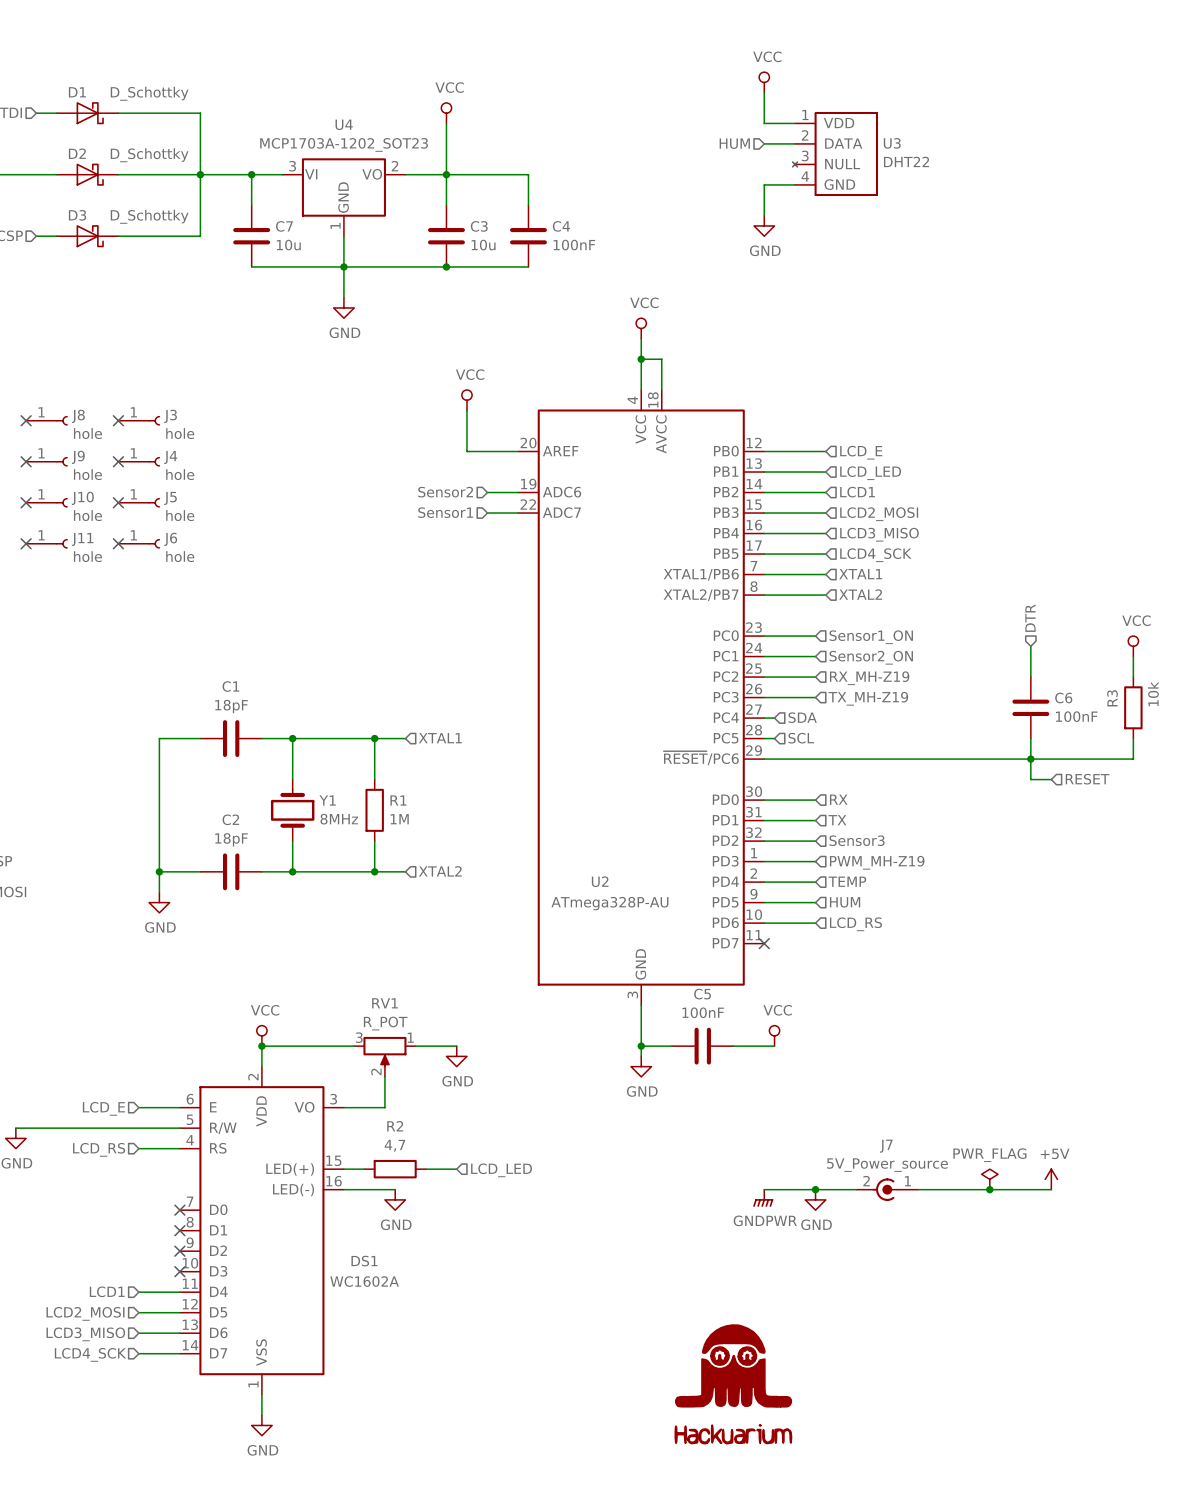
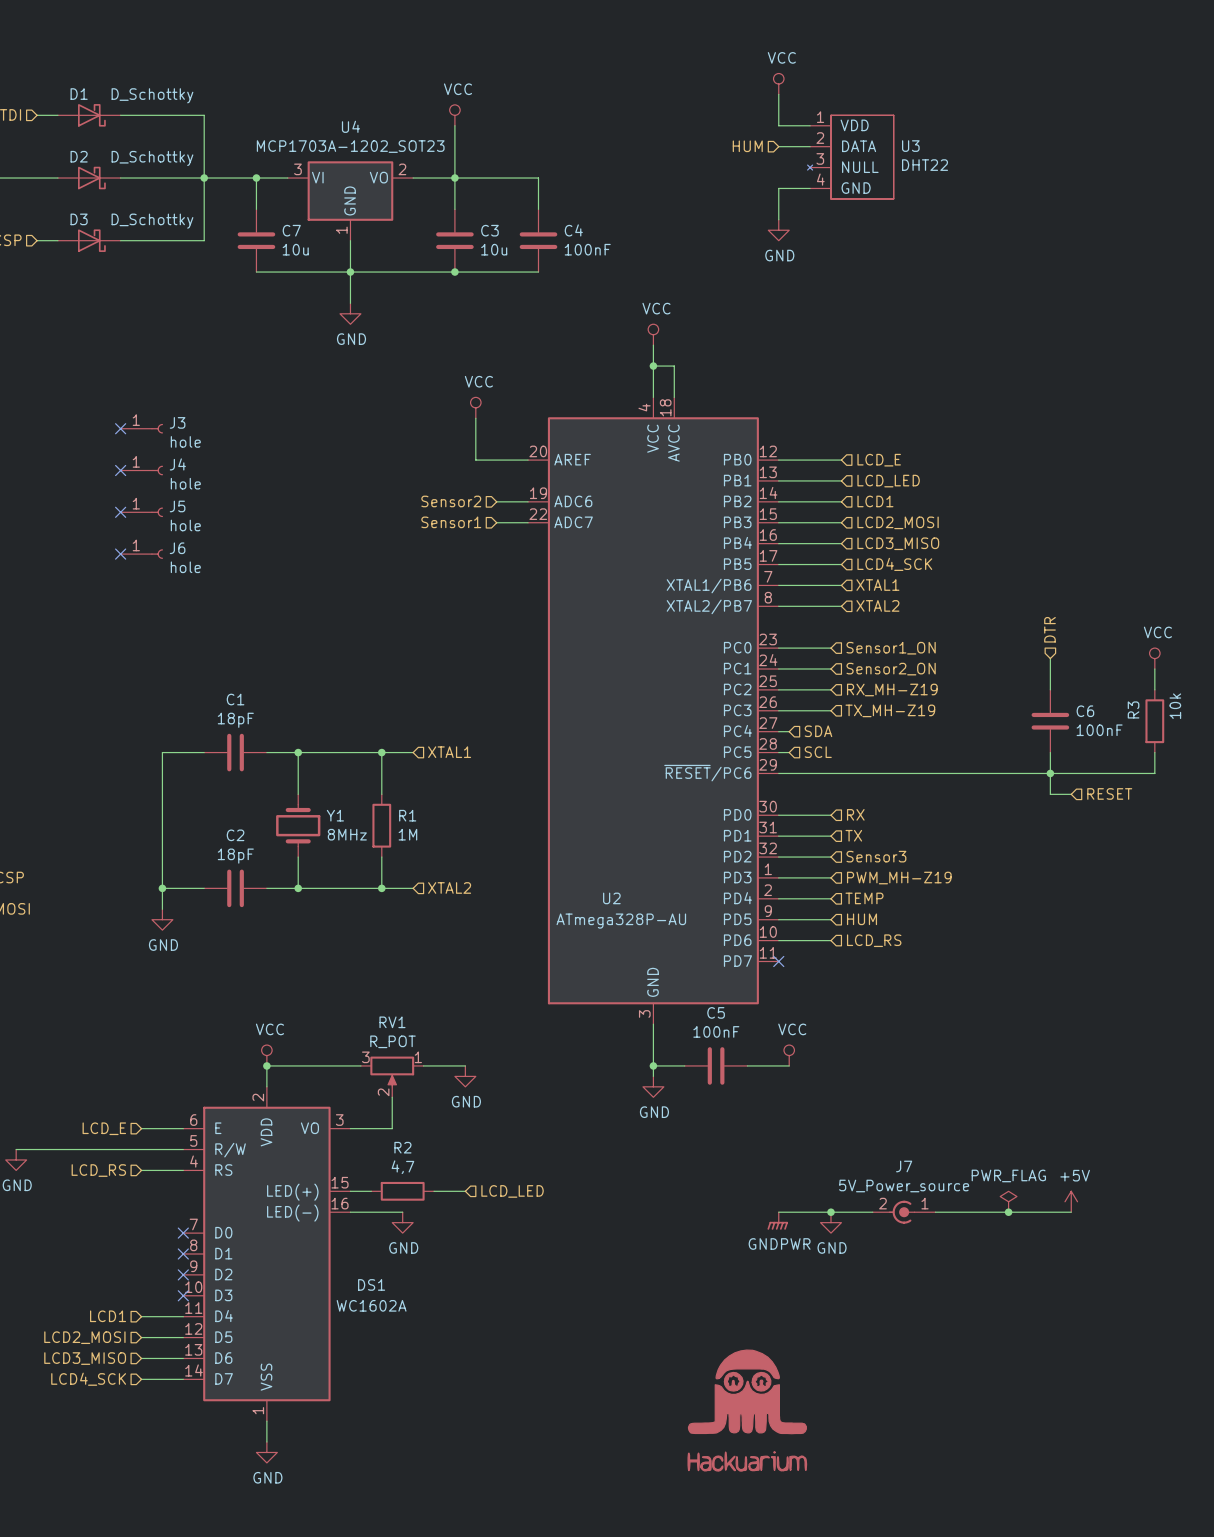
no-connect mark: (26, 420) -> none
J8: hole (46, 420) -> none
no-connect mark: (26, 461) -> none
J9: hole (46, 461) -> none
no-connect mark: (26, 502) -> none
J10: hole (46, 502) -> none
no-connect mark: (26, 543) -> none
J11: hole (46, 543) -> none

